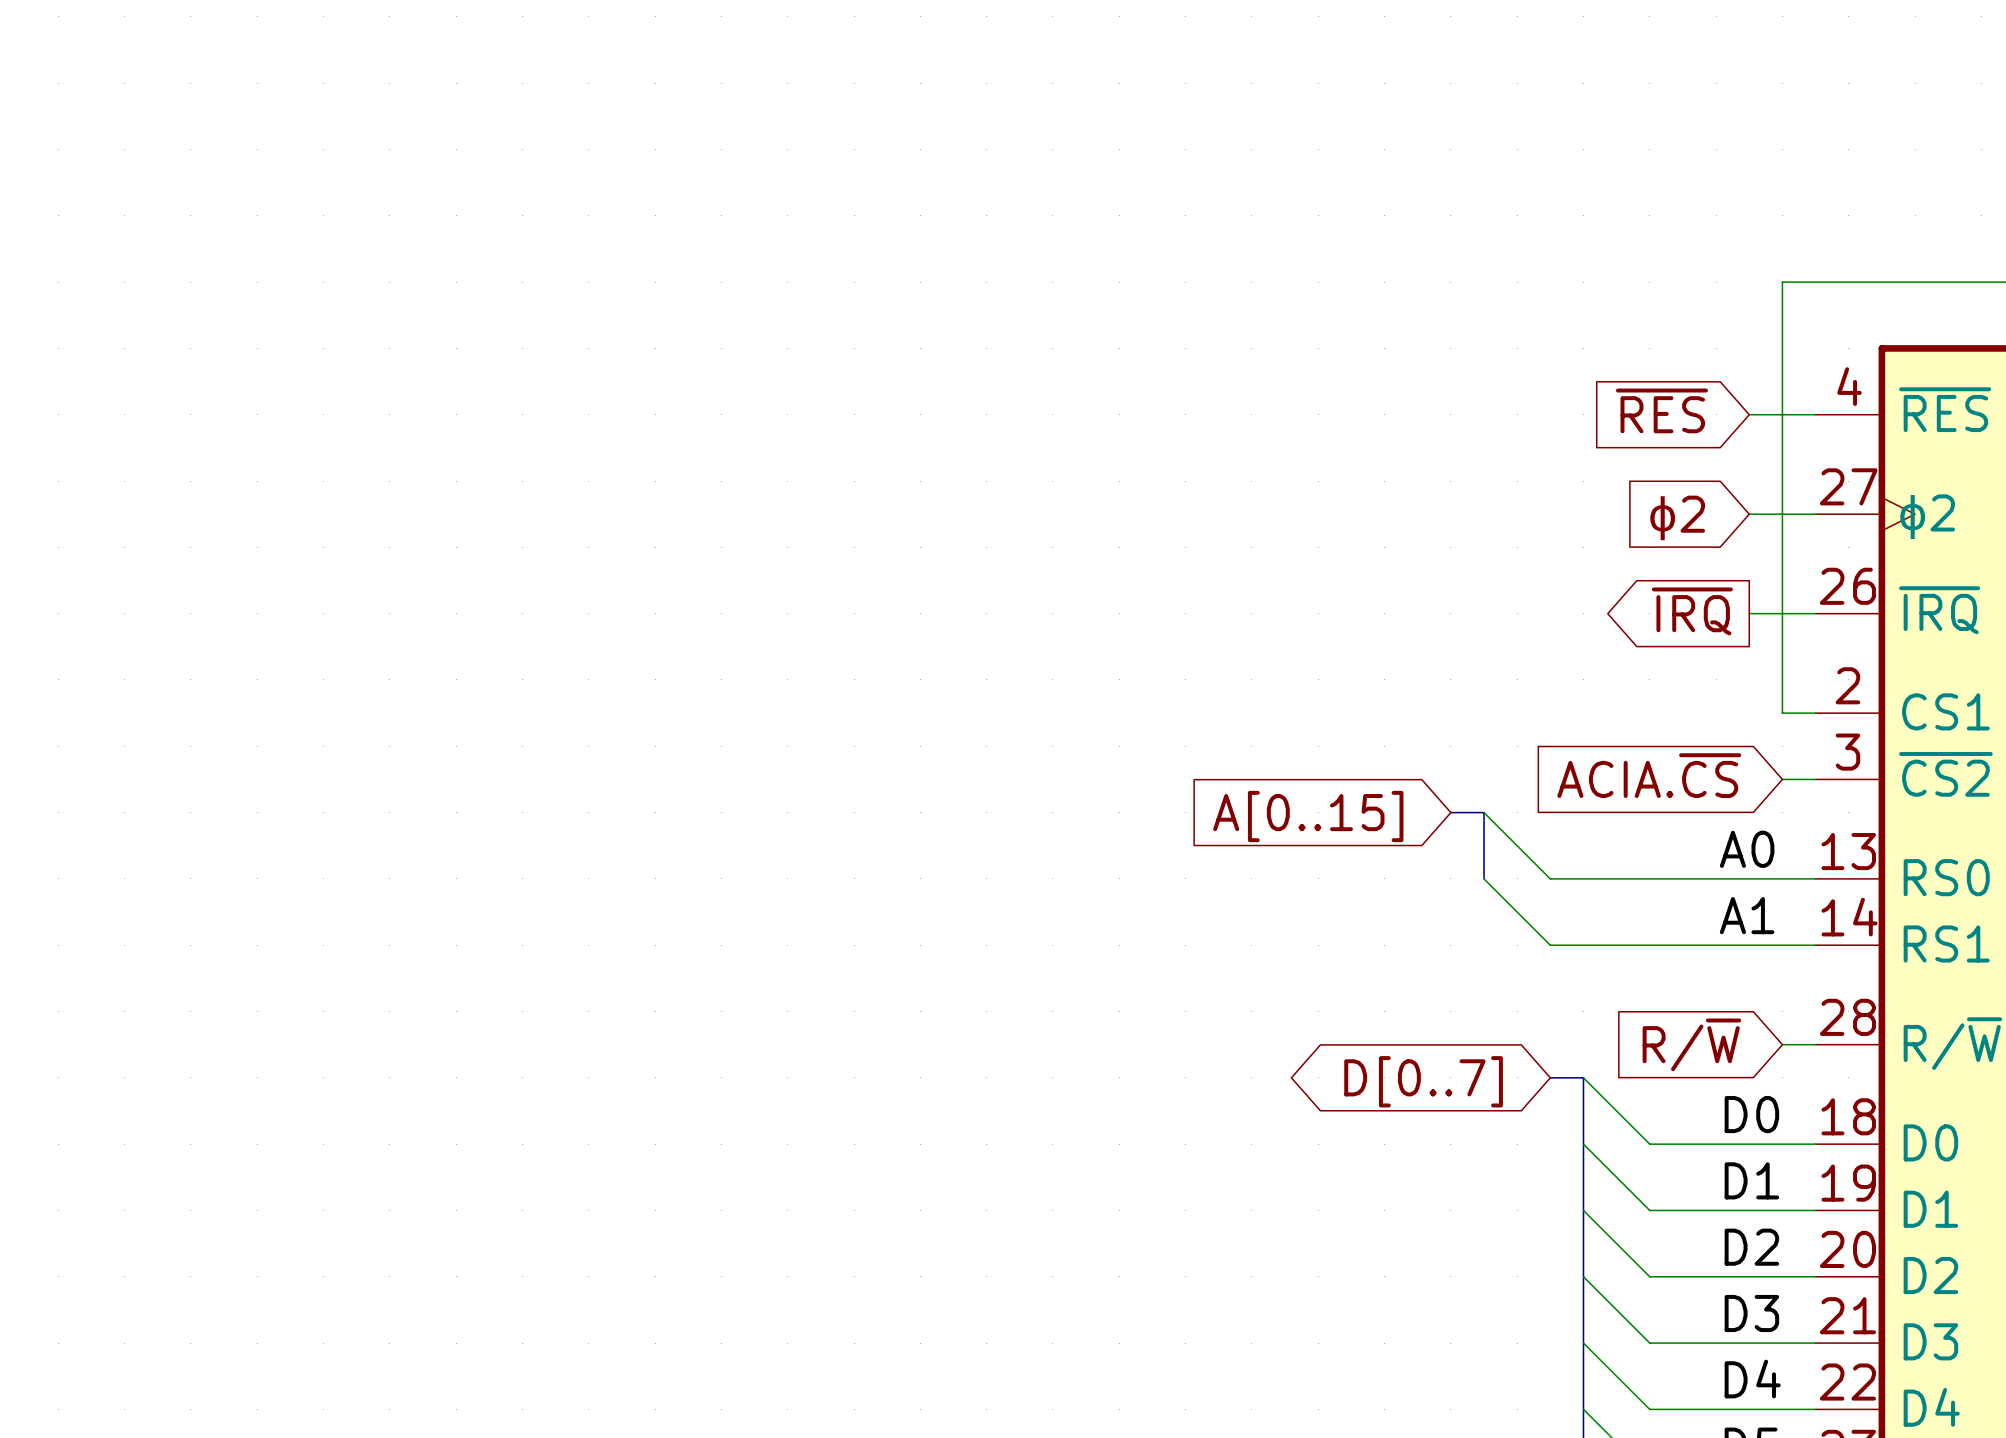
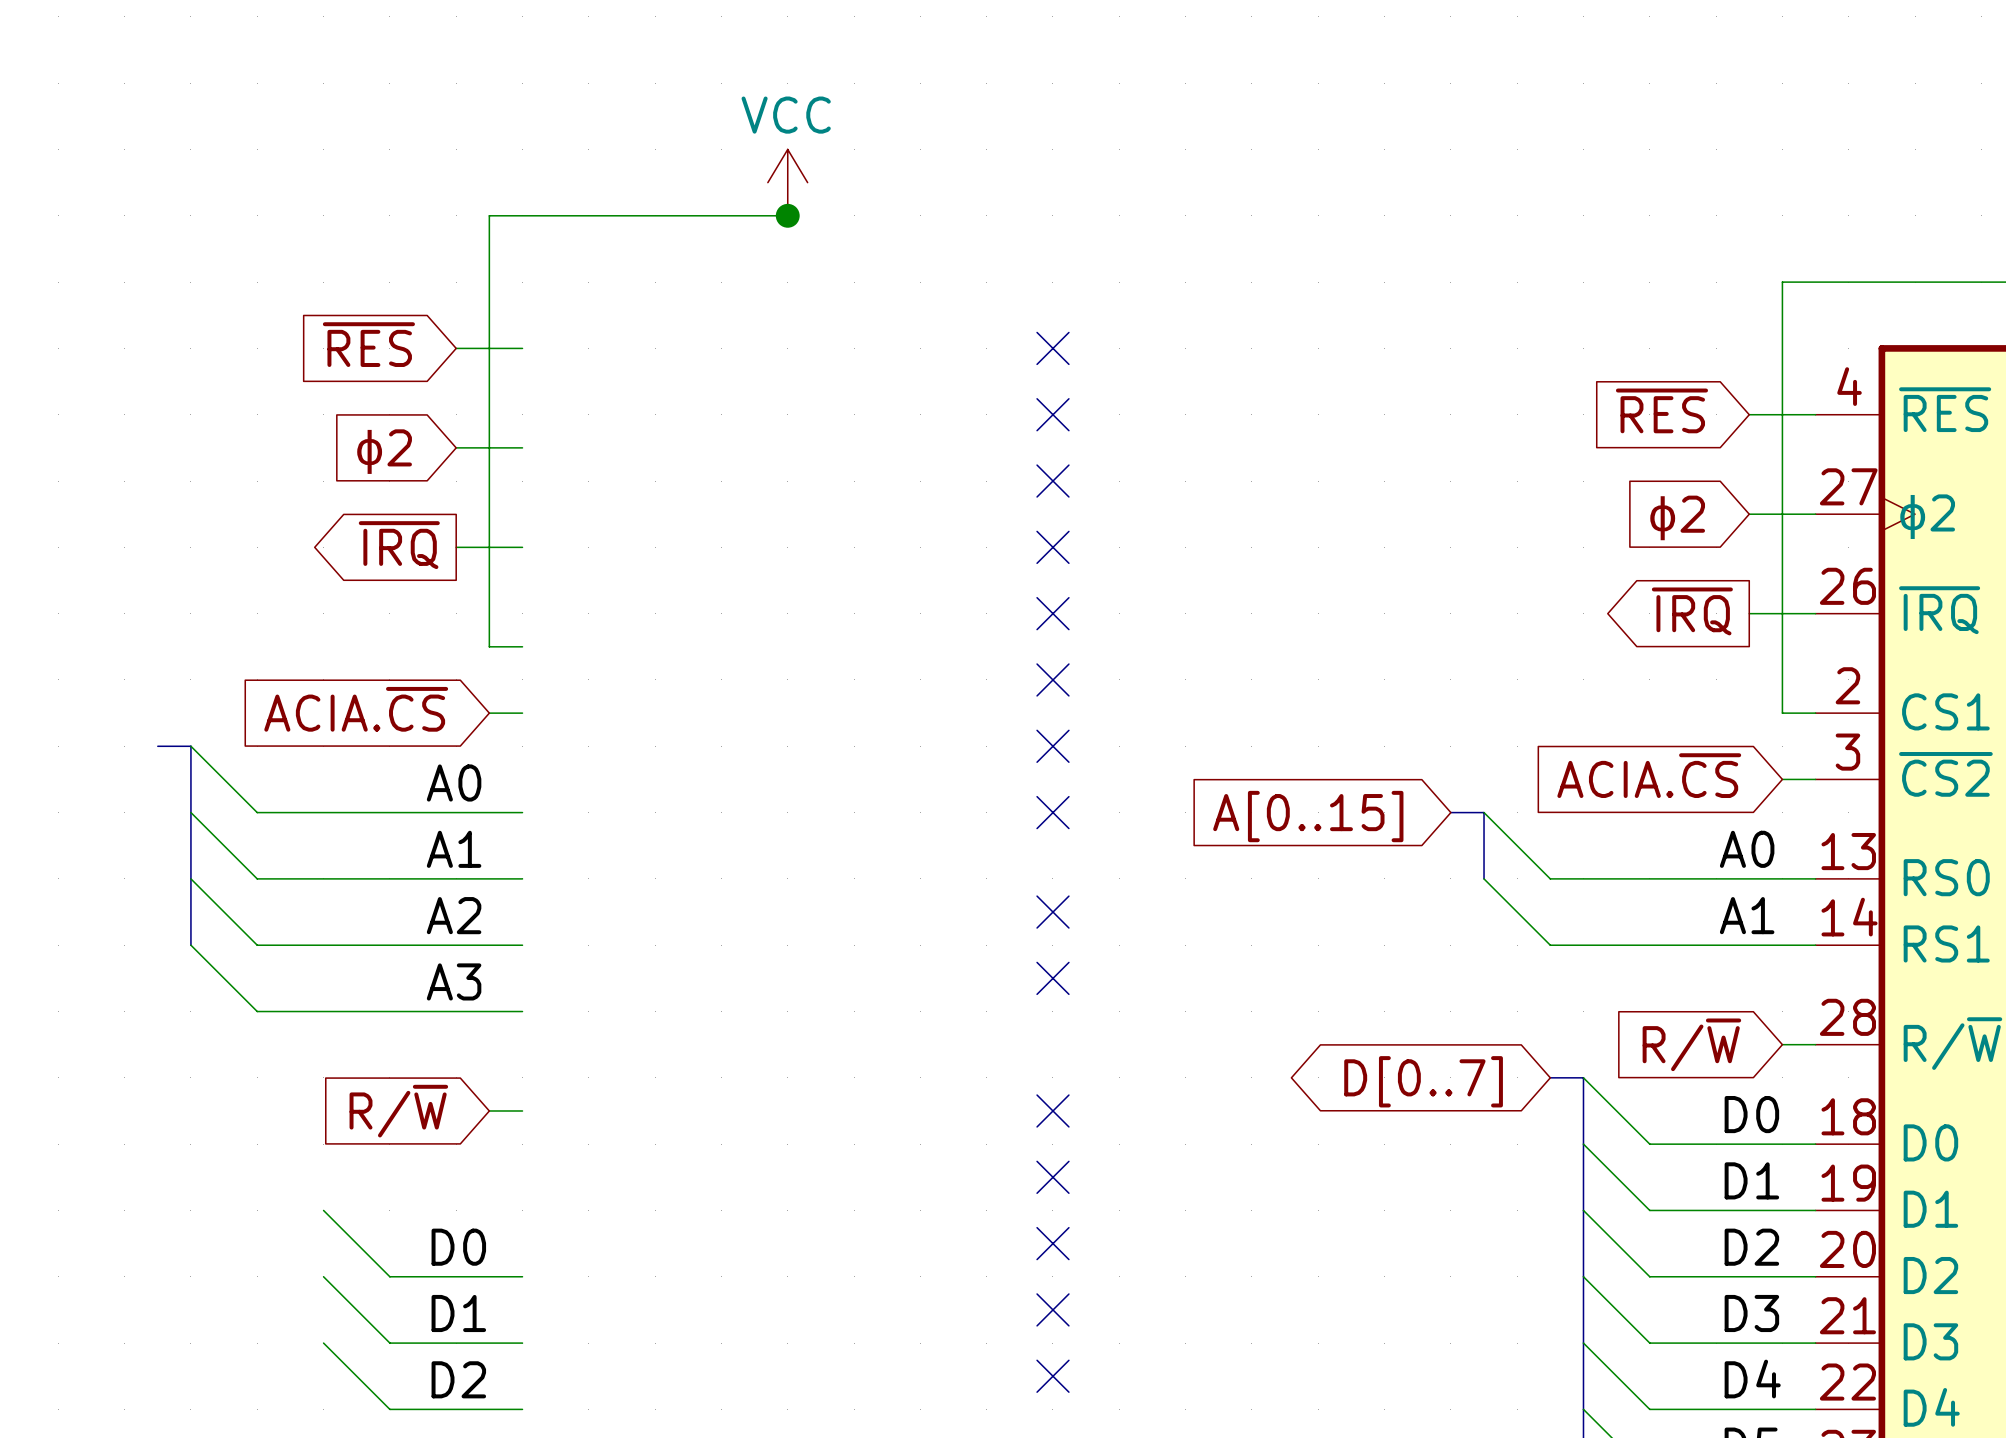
power symbol: none -> VCC (787, 182)
wire: none -> (787, 215) (489, 215) (489, 646) (522, 646)
junction: none -> (787, 215)
global label: none -> ~{RES} (368, 344)
wire: none -> (456, 348) (522, 348)
no-connect mark: none -> (1052, 348)
no-connect mark: none -> (1052, 414)
wire: none -> (456, 447) (522, 447)
global label: none -> ϕ2 (383, 451)
no-connect mark: none -> (1052, 481)
global label: none -> ~{IRQ} (399, 545)
wire: none -> (456, 547) (522, 547)
no-connect mark: none -> (1052, 547)
no-connect mark: none -> (1052, 613)
no-connect mark: none -> (1052, 679)
global label: none -> ACIA.~{CS} (356, 709)
wire: none -> (489, 713) (522, 713)
bus: none -> (157, 746) (190, 746) (190, 945)
wire: none -> (190, 746) (257, 812) (522, 812)
no-connect mark: none -> (1052, 746)
label: none -> A0 (454, 783)
wire: none -> (190, 812) (257, 878) (522, 878)
no-connect mark: none -> (1052, 812)
label: none -> A1 (454, 849)
wire: none -> (190, 878) (257, 945) (522, 945)
no-connect mark: none -> (1052, 912)
label: none -> A2 (454, 915)
wire: none -> (190, 945) (257, 1011) (522, 1011)
no-connect mark: none -> (1052, 978)
label: none -> A3 (454, 981)
wire: none -> (489, 1110) (522, 1110)
no-connect mark: none -> (1052, 1110)
global label: none -> R/~{W} (398, 1111)
no-connect mark: none -> (1052, 1177)
wire: none -> (323, 1210) (389, 1276) (522, 1276)
no-connect mark: none -> (1052, 1243)
label: none -> D0 (458, 1247)
wire: none -> (323, 1276) (389, 1343) (522, 1343)
no-connect mark: none -> (1052, 1309)
label: none -> D1 (458, 1313)
wire: none -> (323, 1343) (389, 1409) (522, 1409)
no-connect mark: none -> (1052, 1376)
label: none -> D2 (458, 1379)

